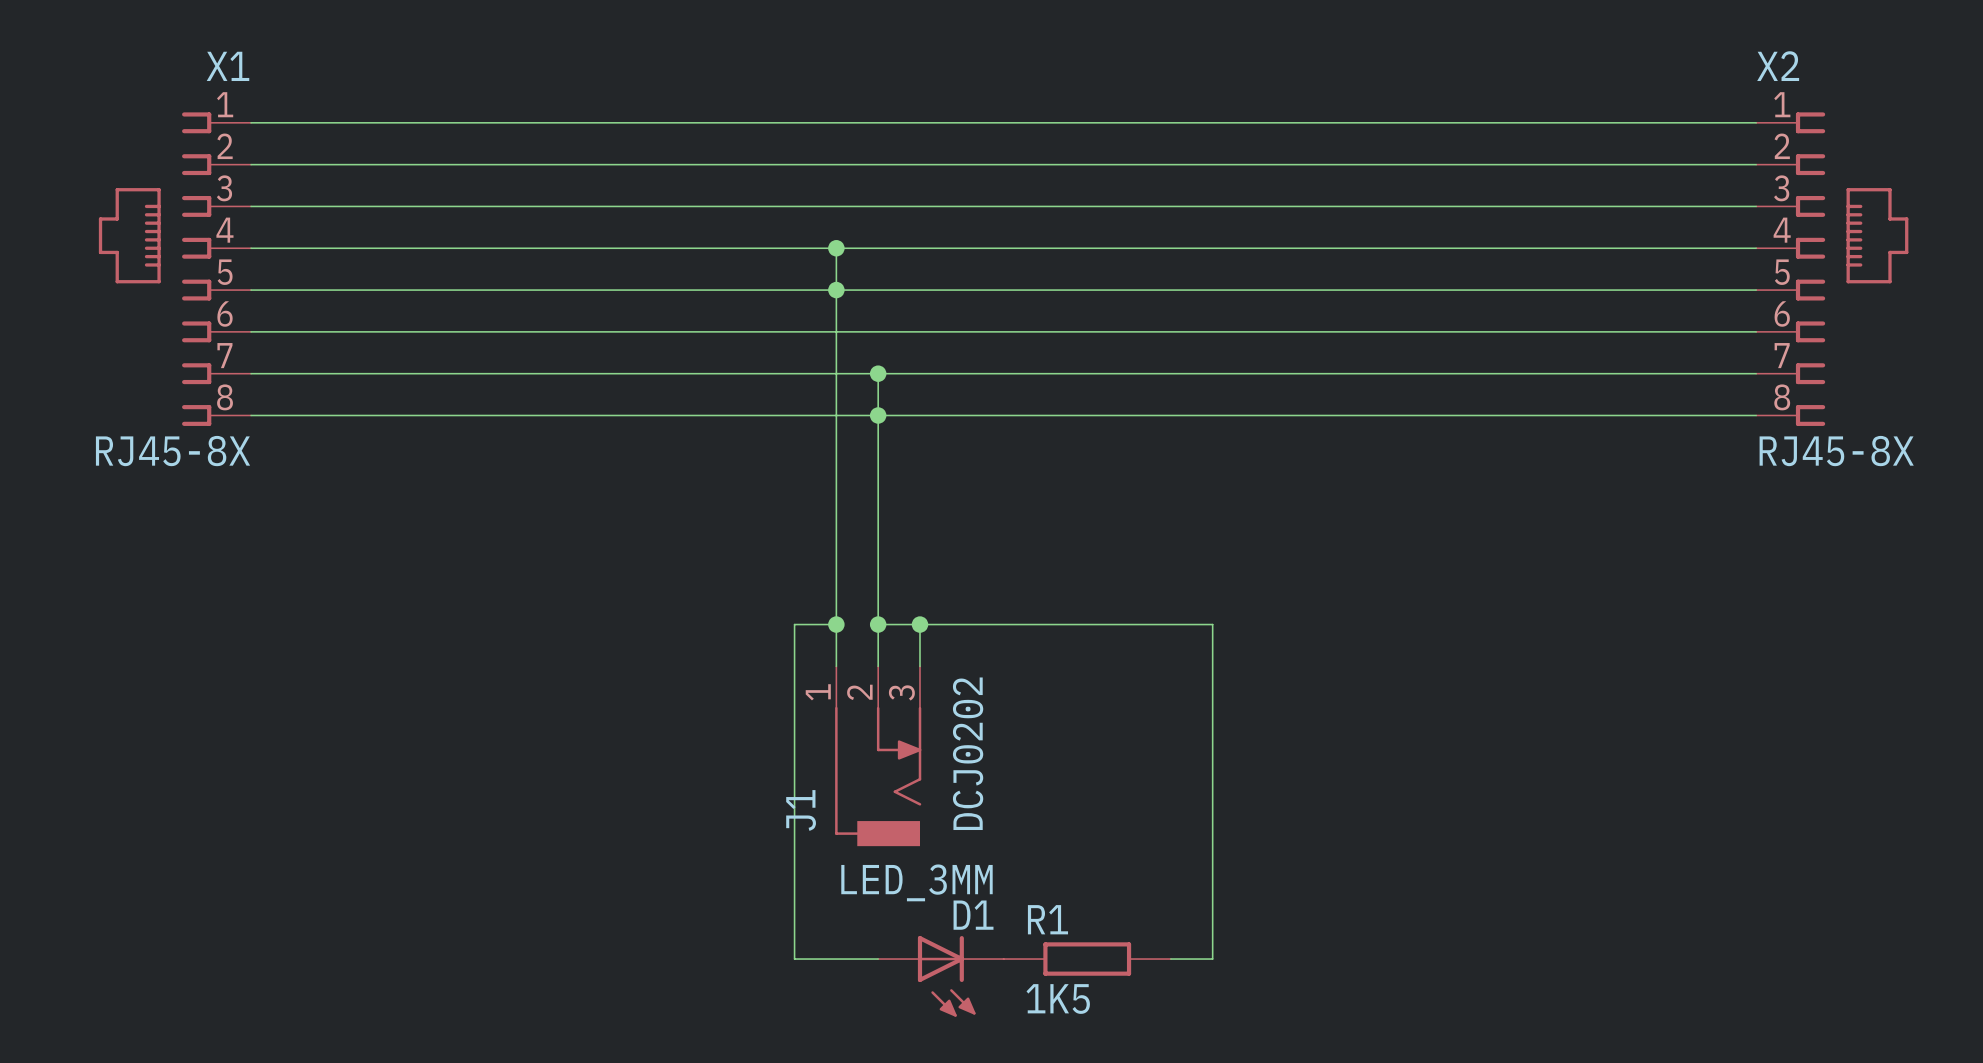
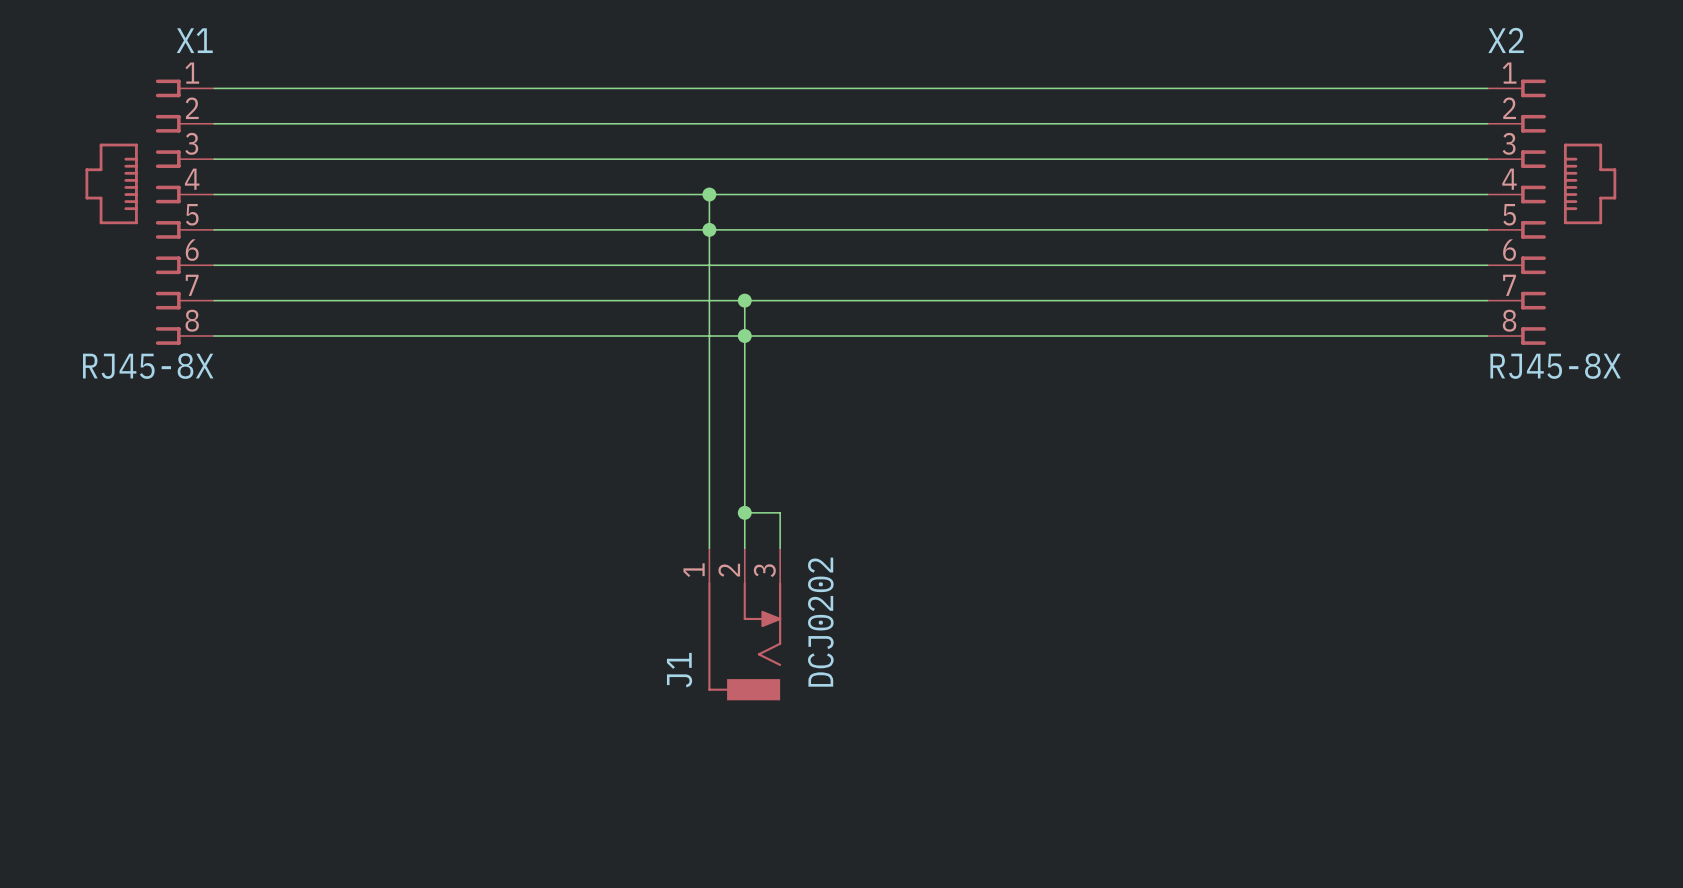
wire: (836, 624) (794, 624) (794, 959) (878, 959) -> none
junction: (836, 624) -> none
wire: (919, 624) (1212, 624) (1212, 959) (1170, 959) -> none
junction: (919, 624) -> none
R1: 1K5 (1087, 959) -> none
D1: LED_3MM (940, 976) -> none

